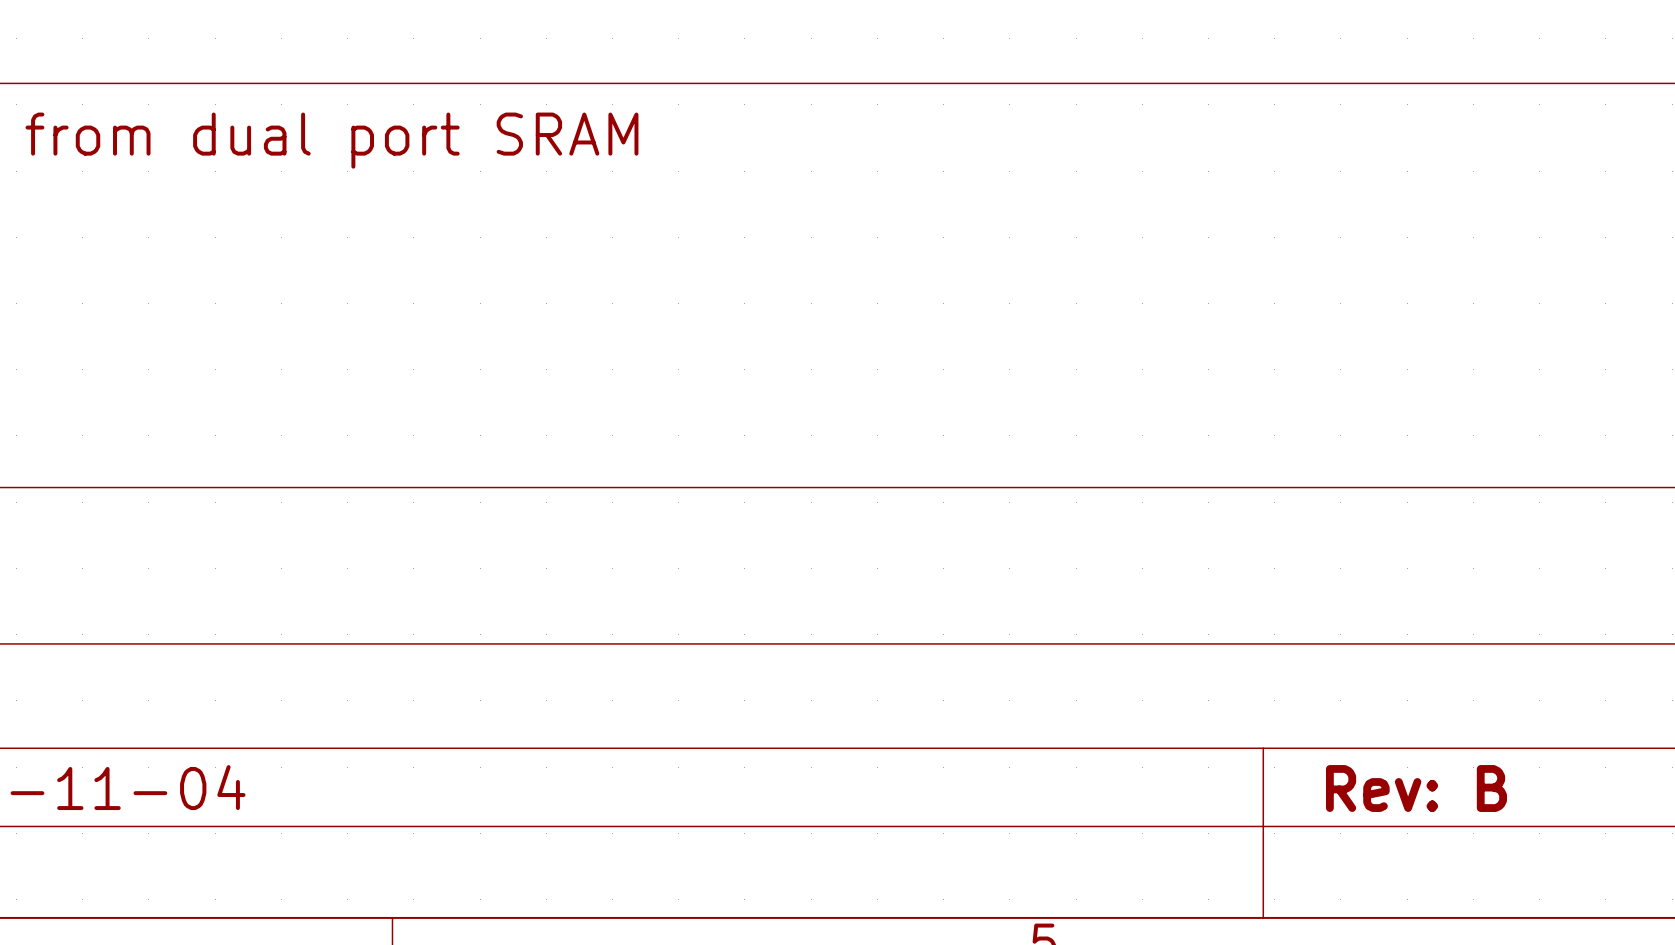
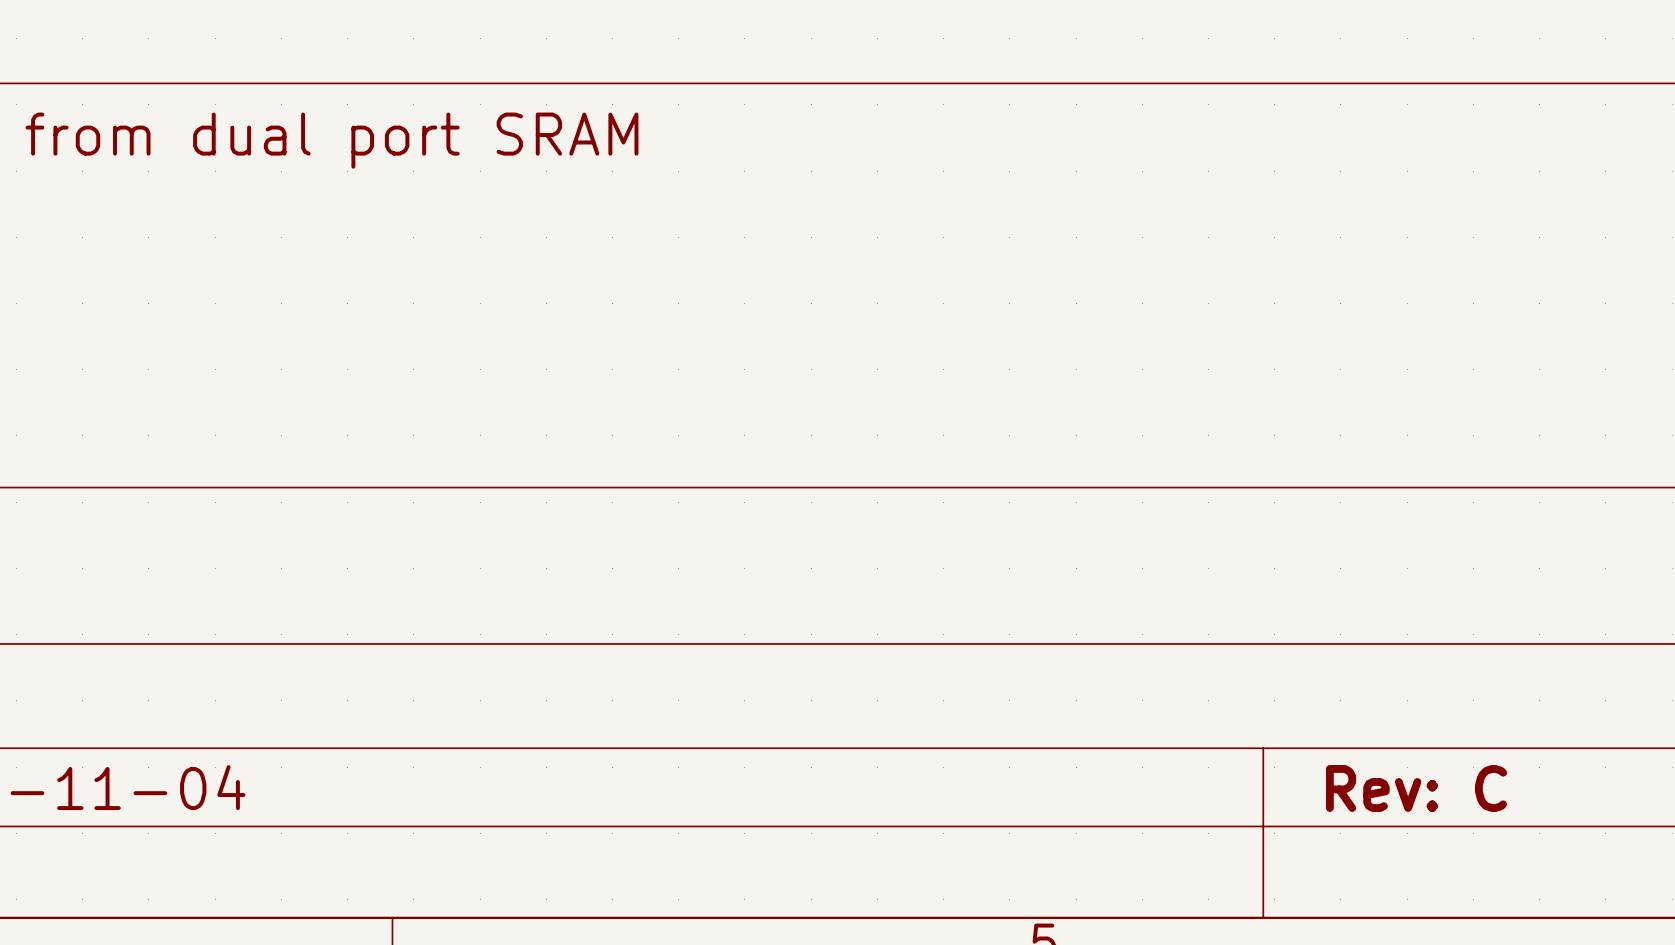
title block: Rev: B (1416, 788) -> Rev: C (1416, 788)

